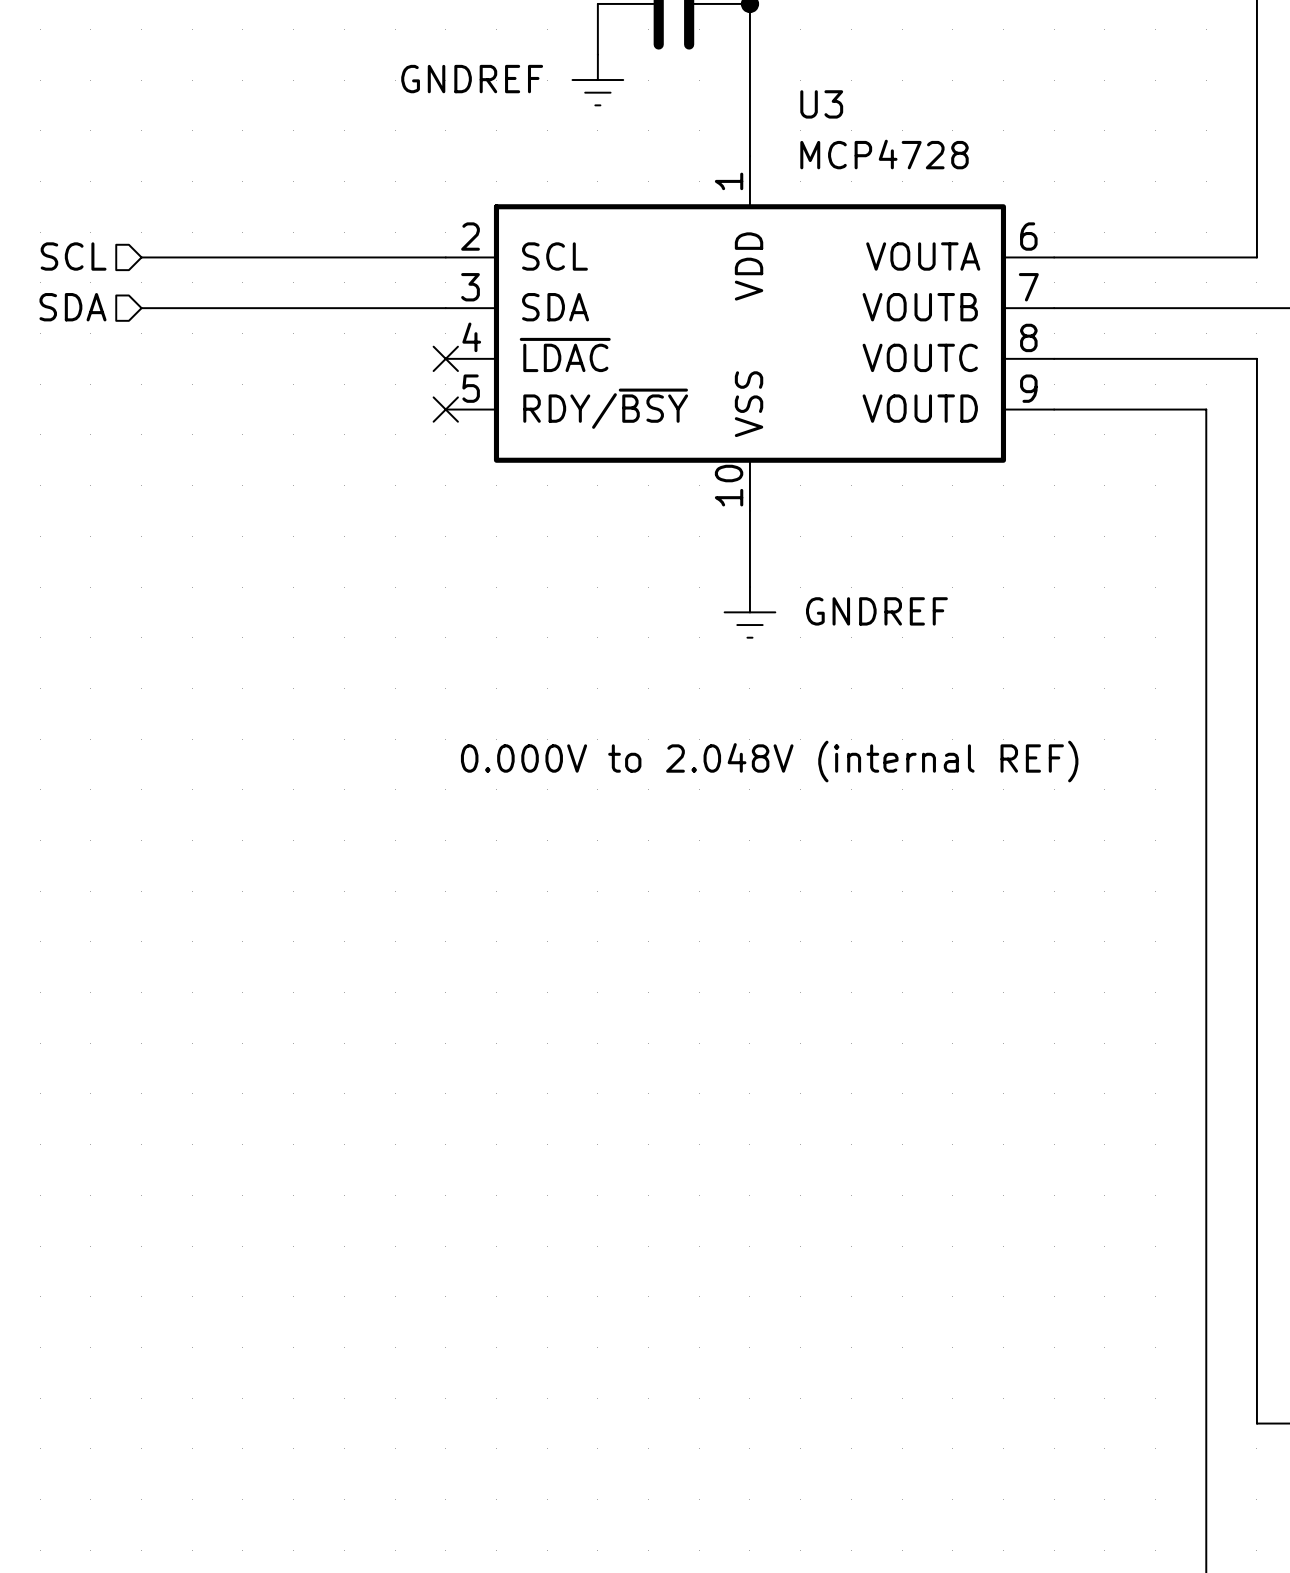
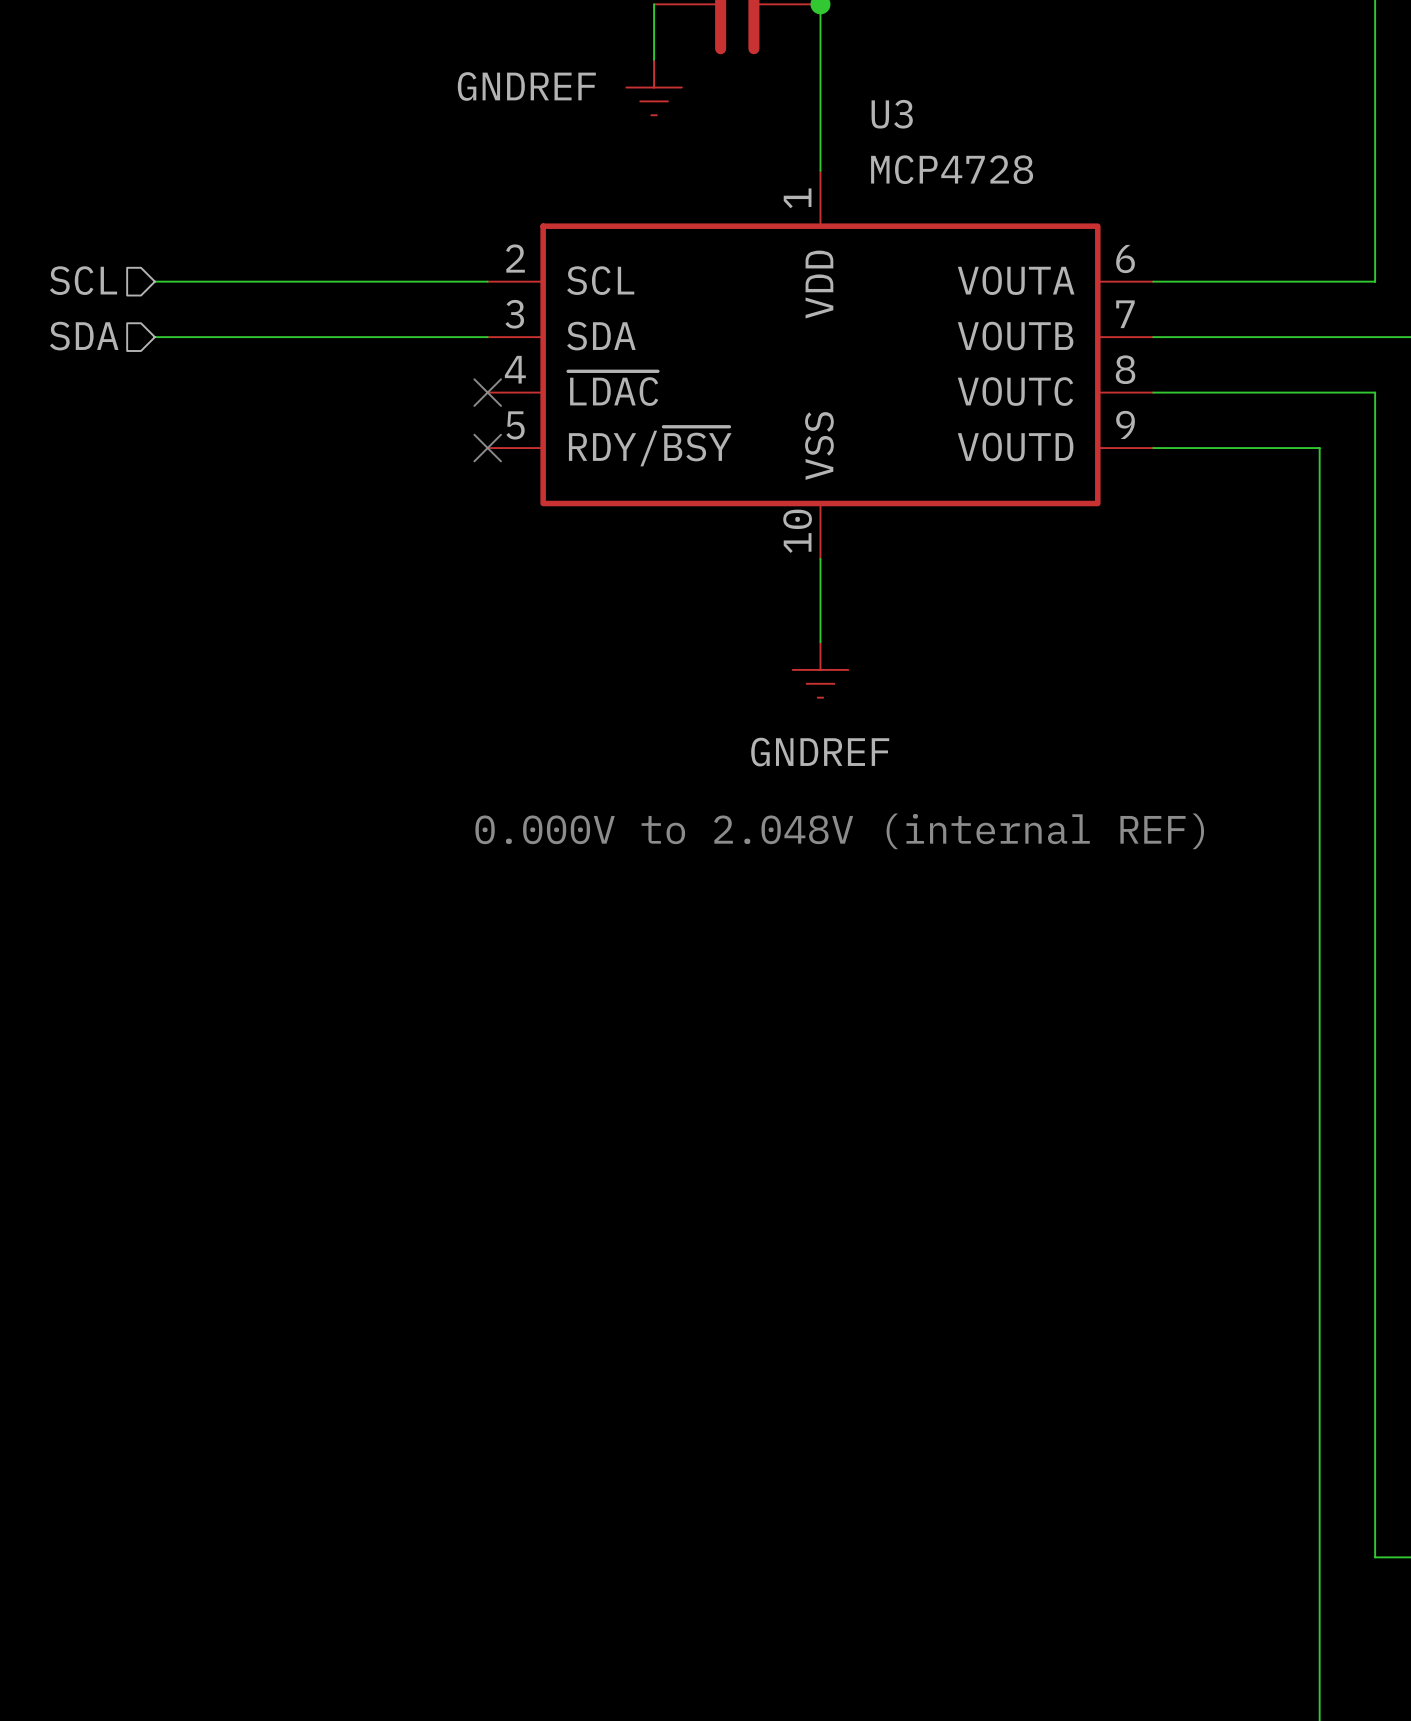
power symbol text position: GNDREF (876, 611) -> GNDREF (820, 752)

